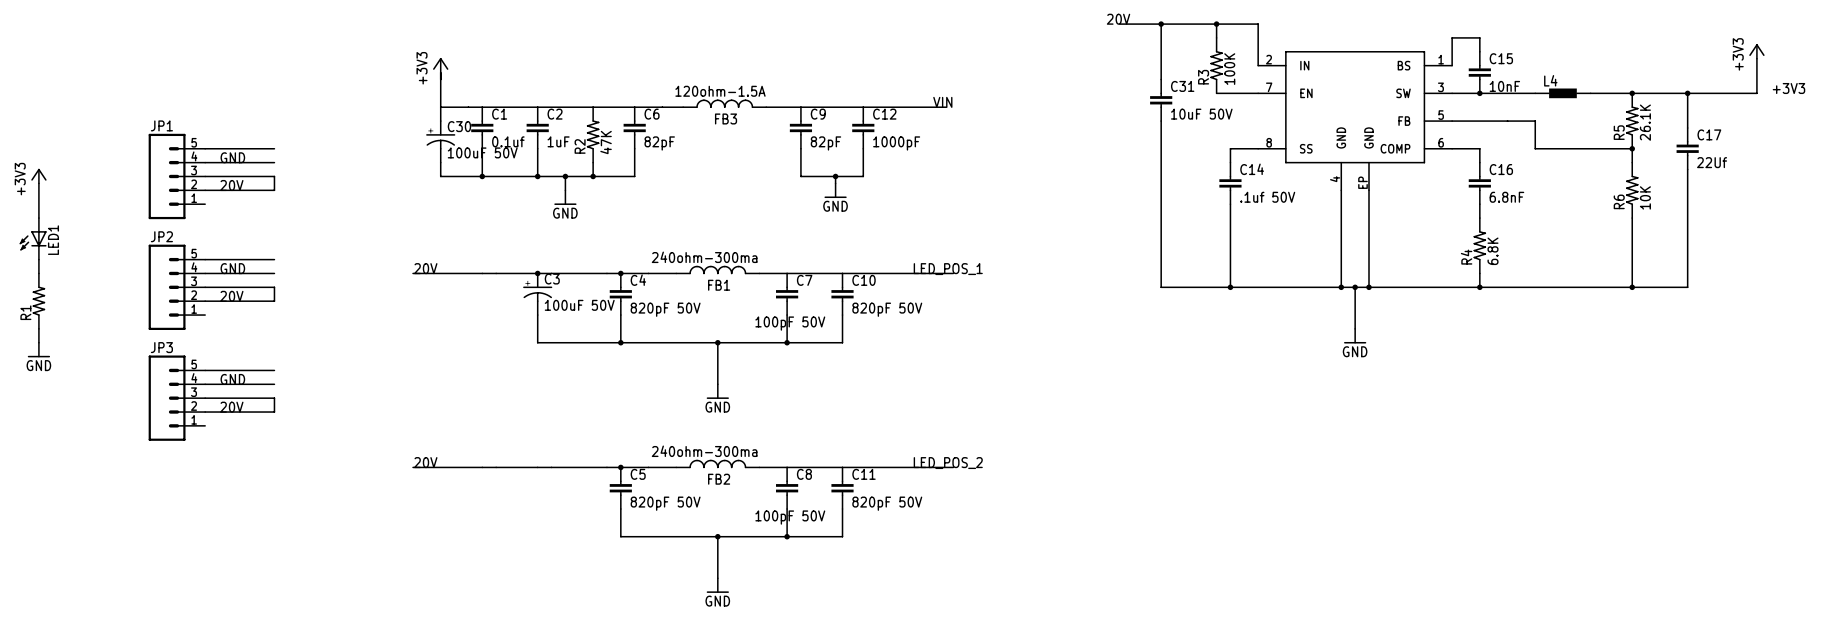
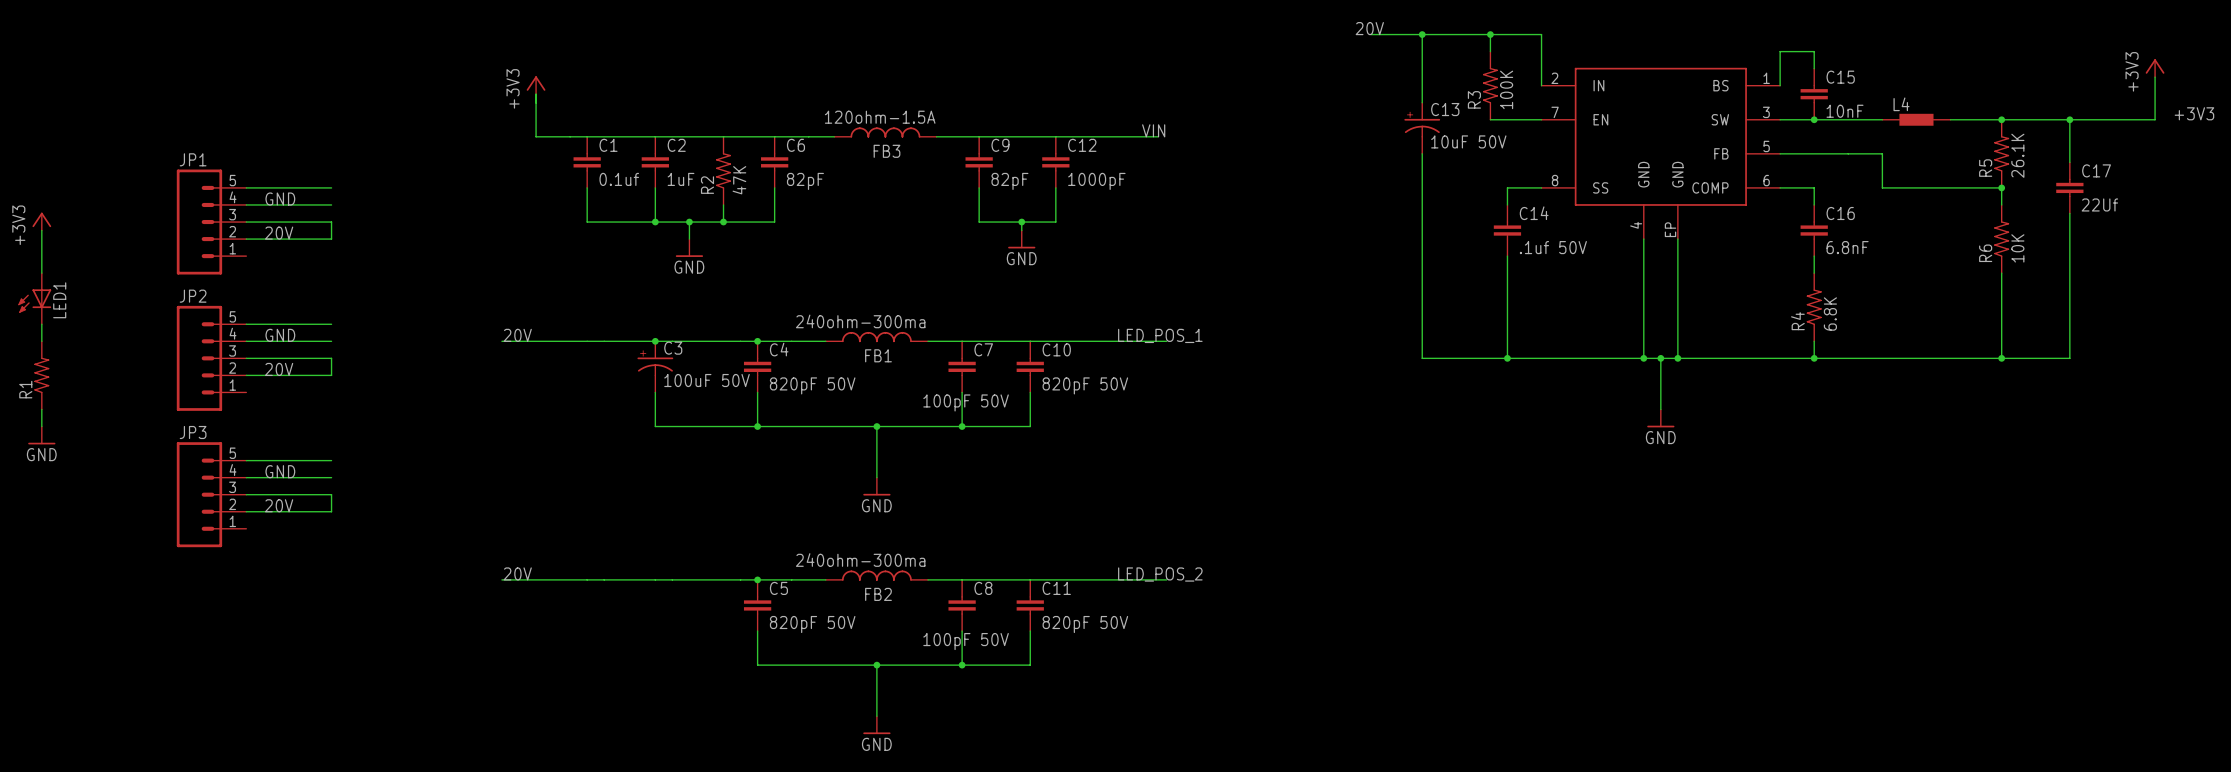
C31: 10uF 50V (1161, 100) -> none
C13: none -> 10uF 50V (1422, 128)
wire: (440, 107) (440, 121) -> none
C30: 100uF 50V (440, 141) -> none
wire: (440, 162) (440, 176) (482, 176) -> none
junction: (482, 176) -> none

